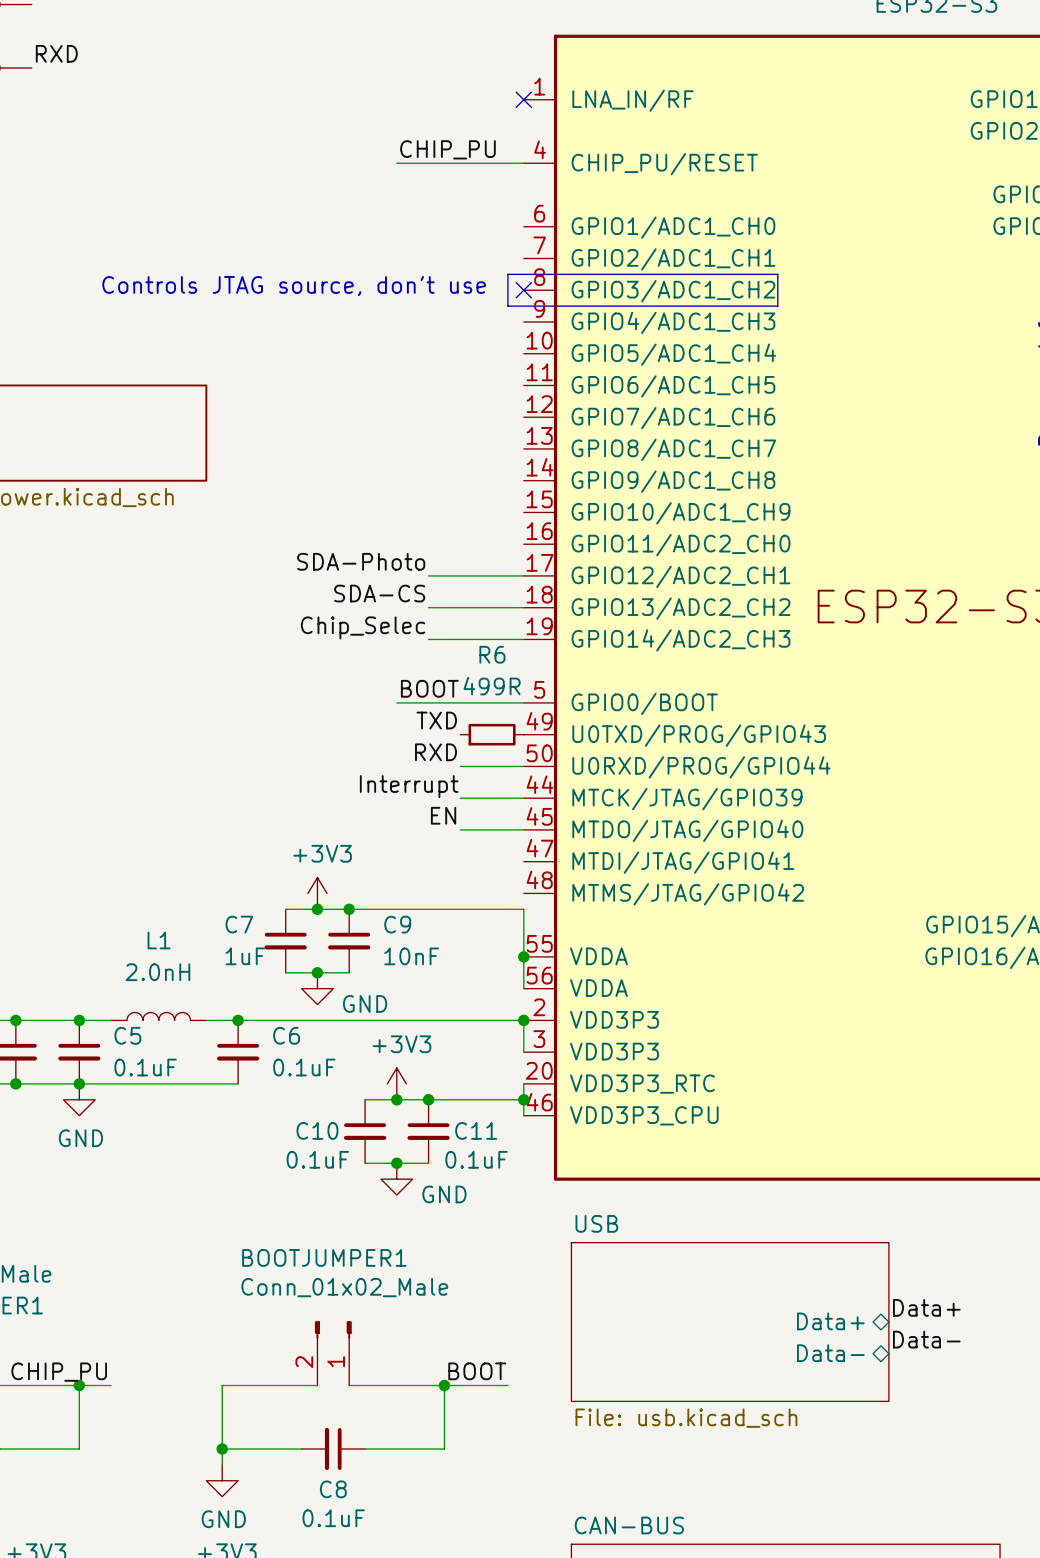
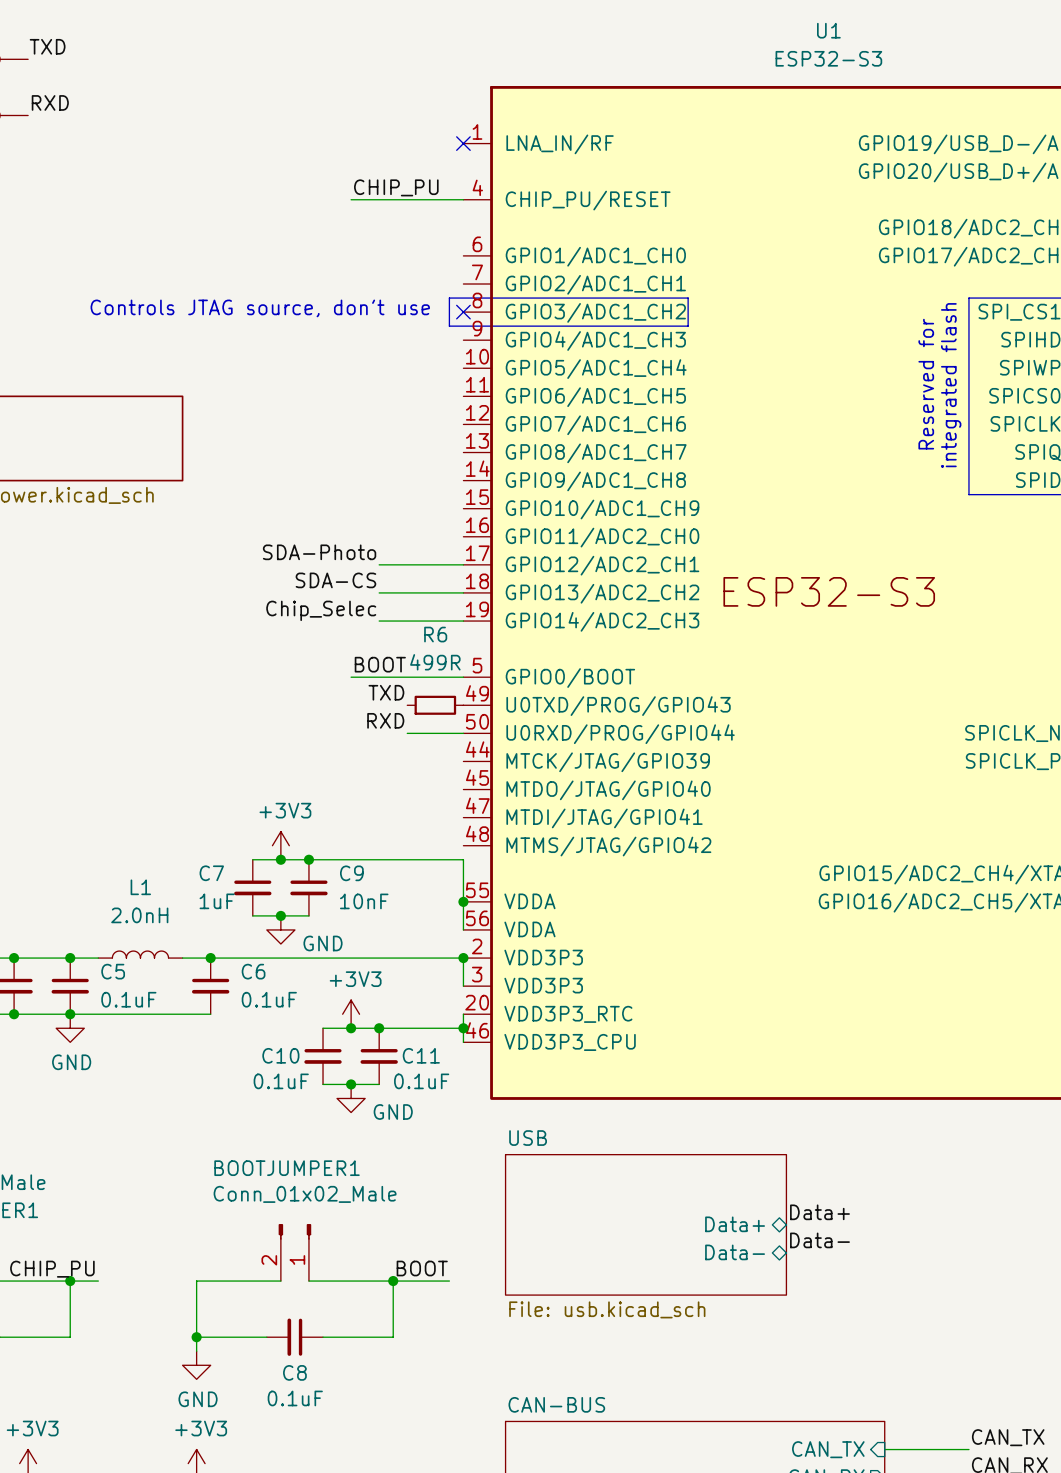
label: Interrupt (409, 786) -> none
wire: (460, 798) (523, 798) -> none
label: EN (443, 815) -> none
wire: (460, 829) (523, 829) -> none

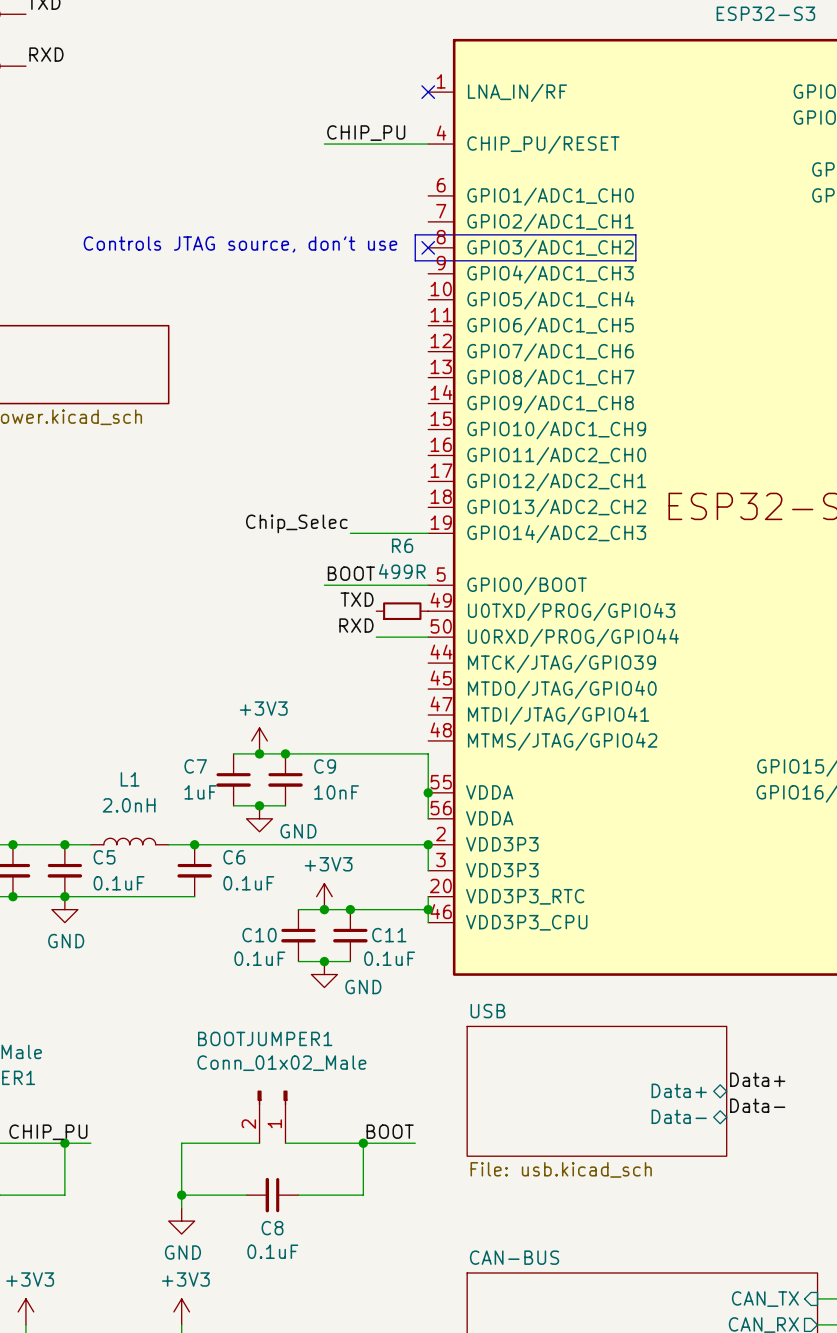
label: SDA-Photo (319, 552) -> none
wire: (379, 564) (463, 564) -> none
label: SDA-CS (335, 580) -> none
wire: (379, 592) (463, 592) -> none

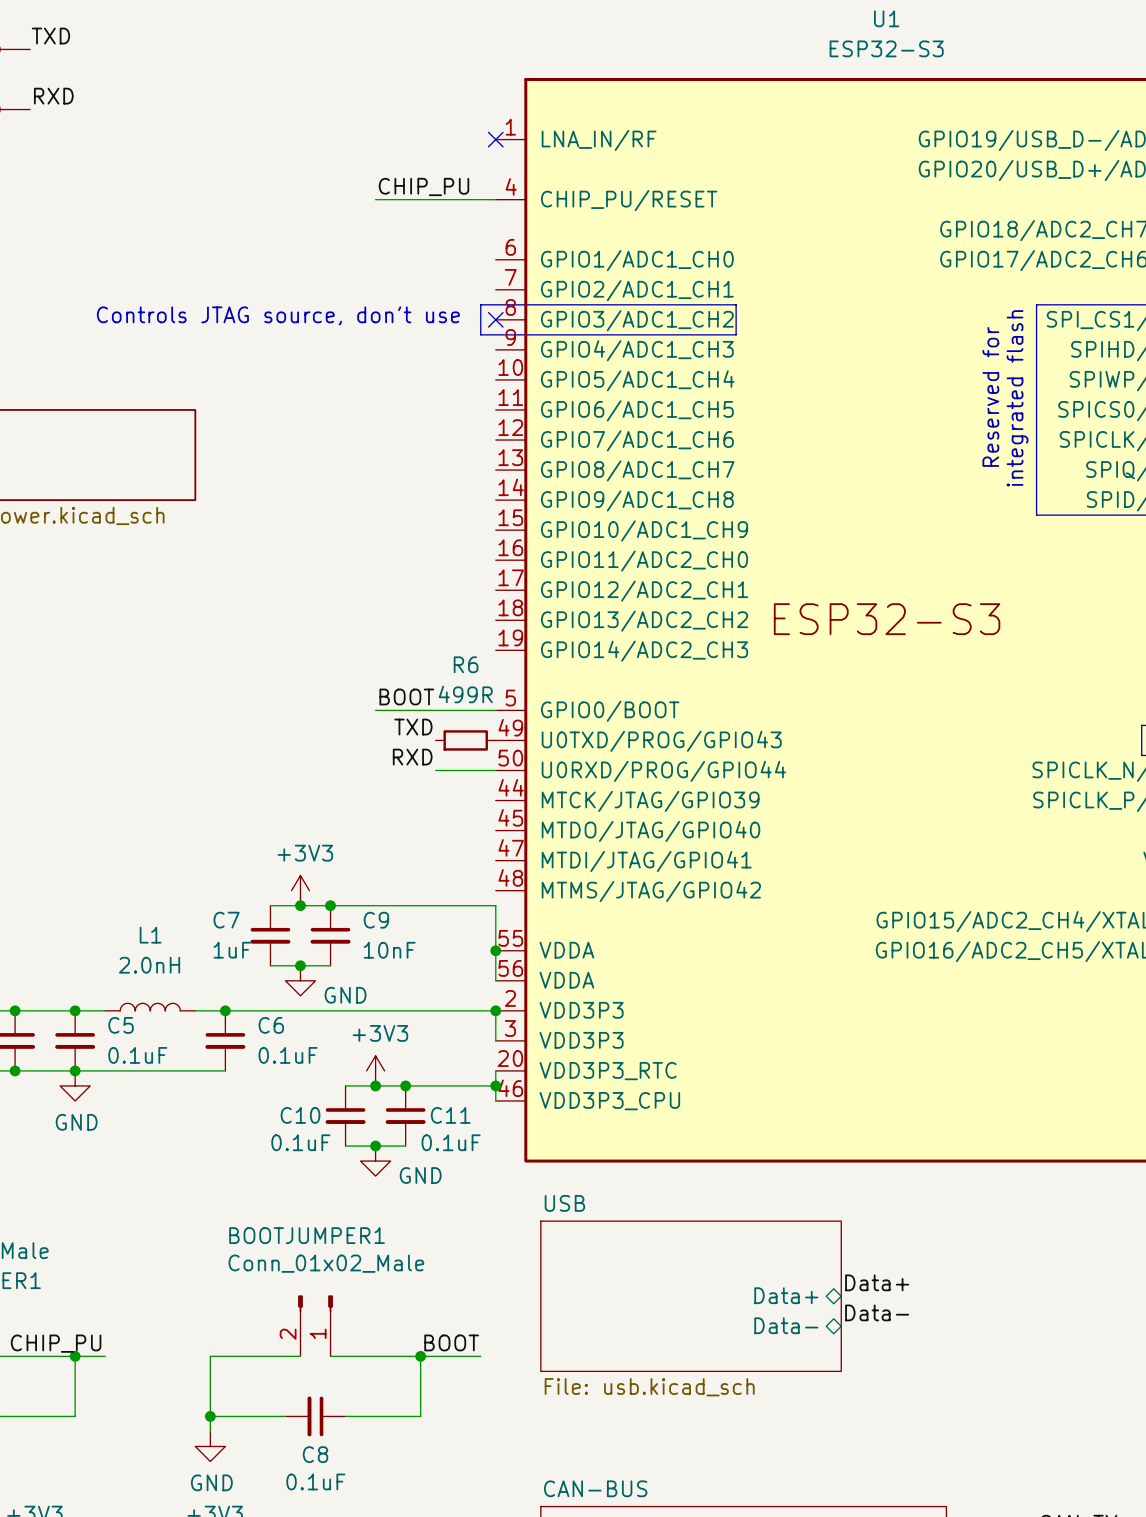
label: Chip_Selec (296, 523) -> none
wire: (350, 533) (428, 533) -> none

